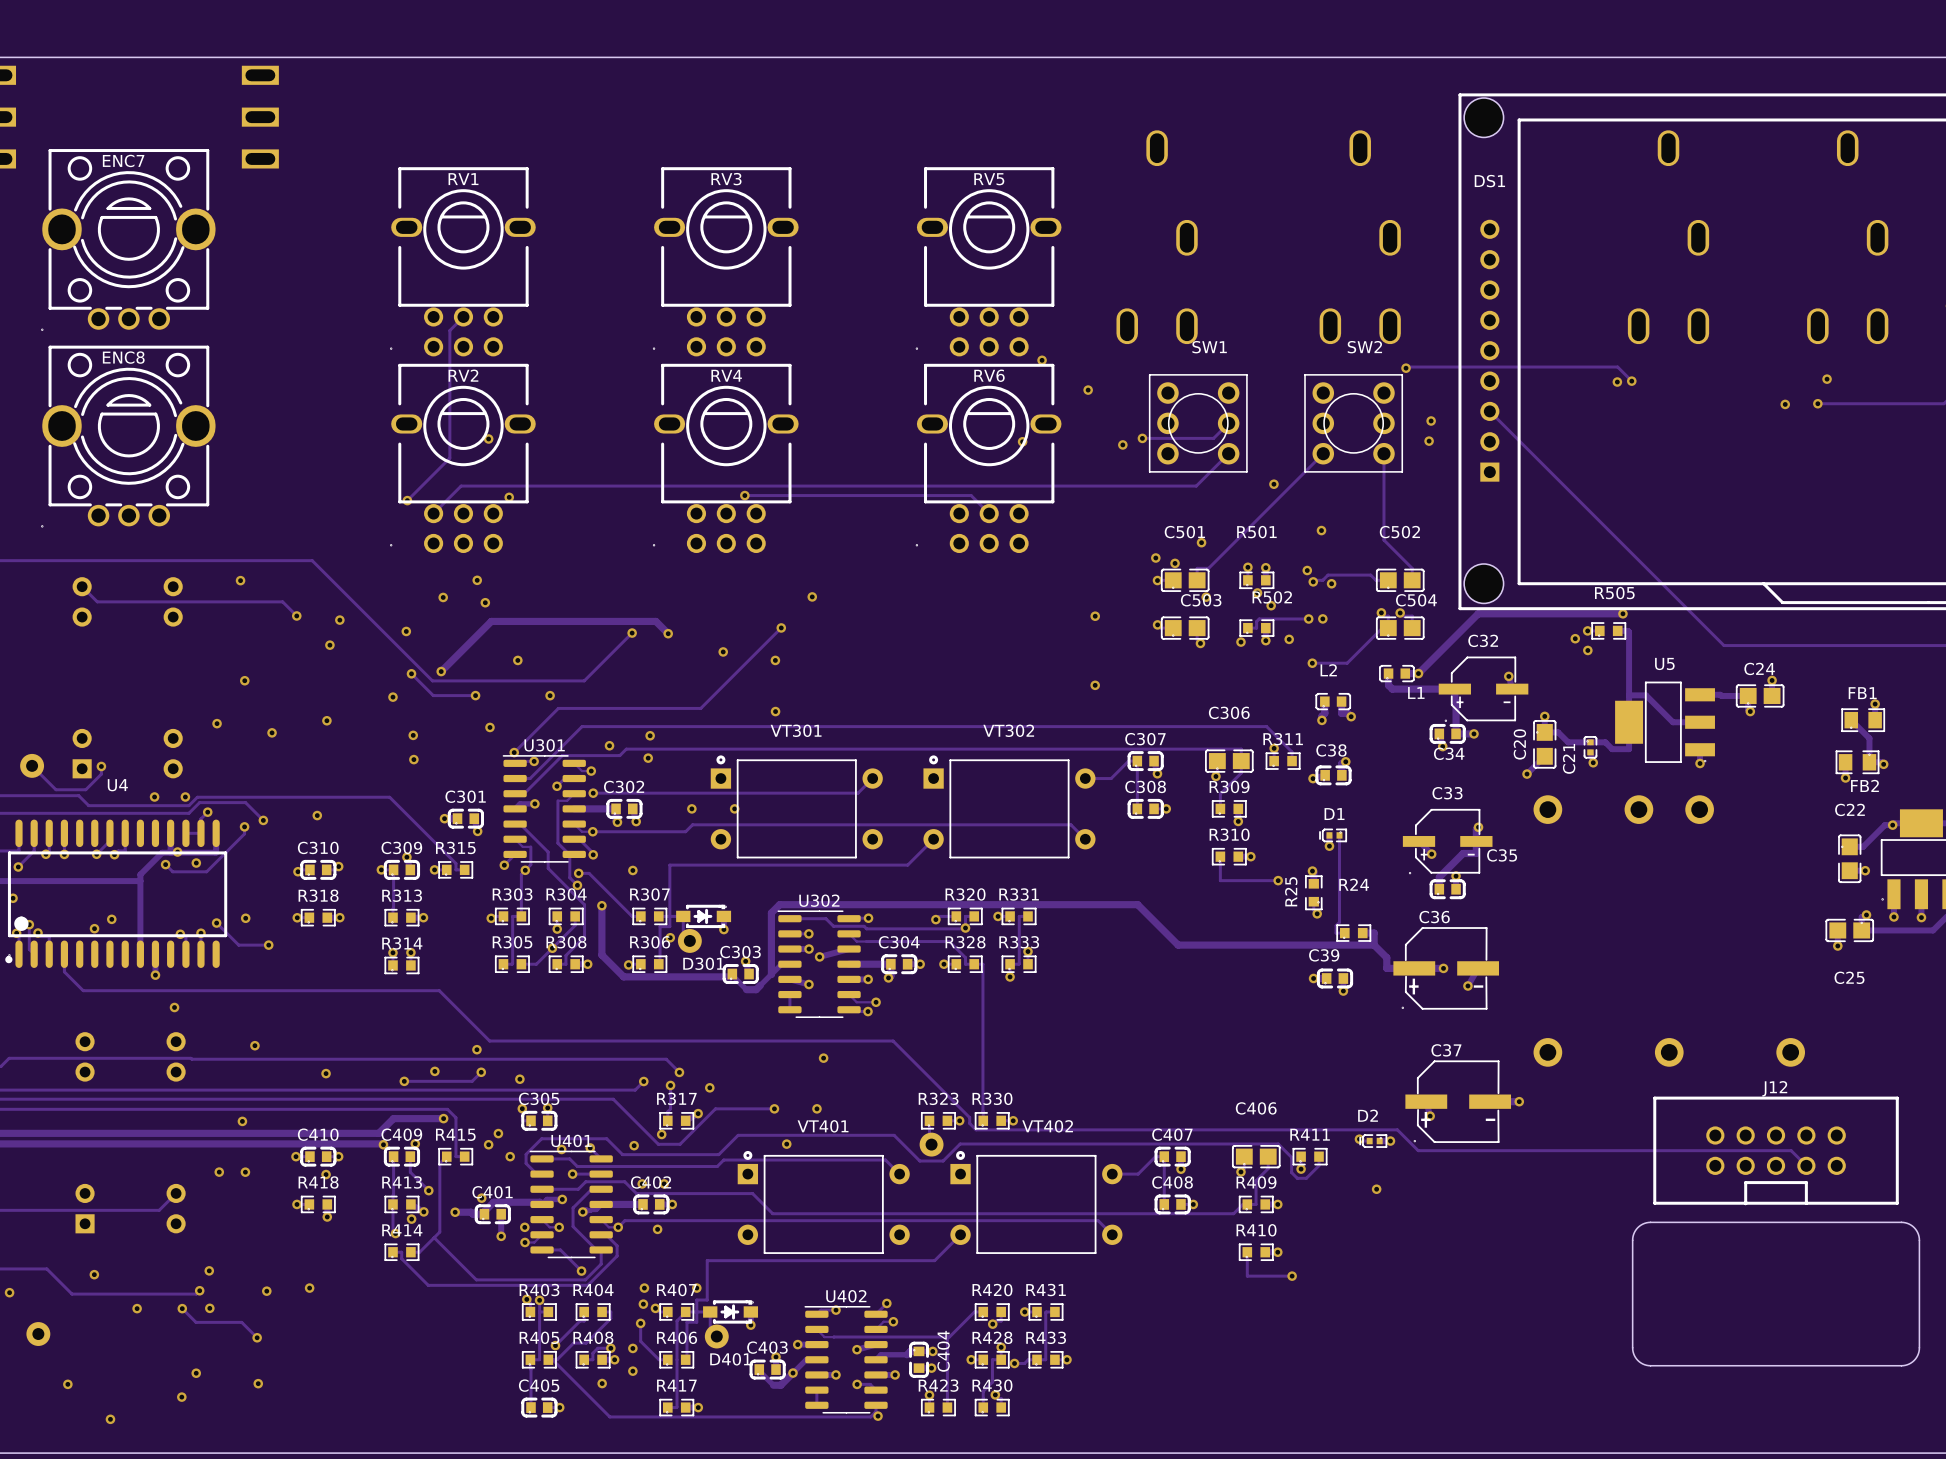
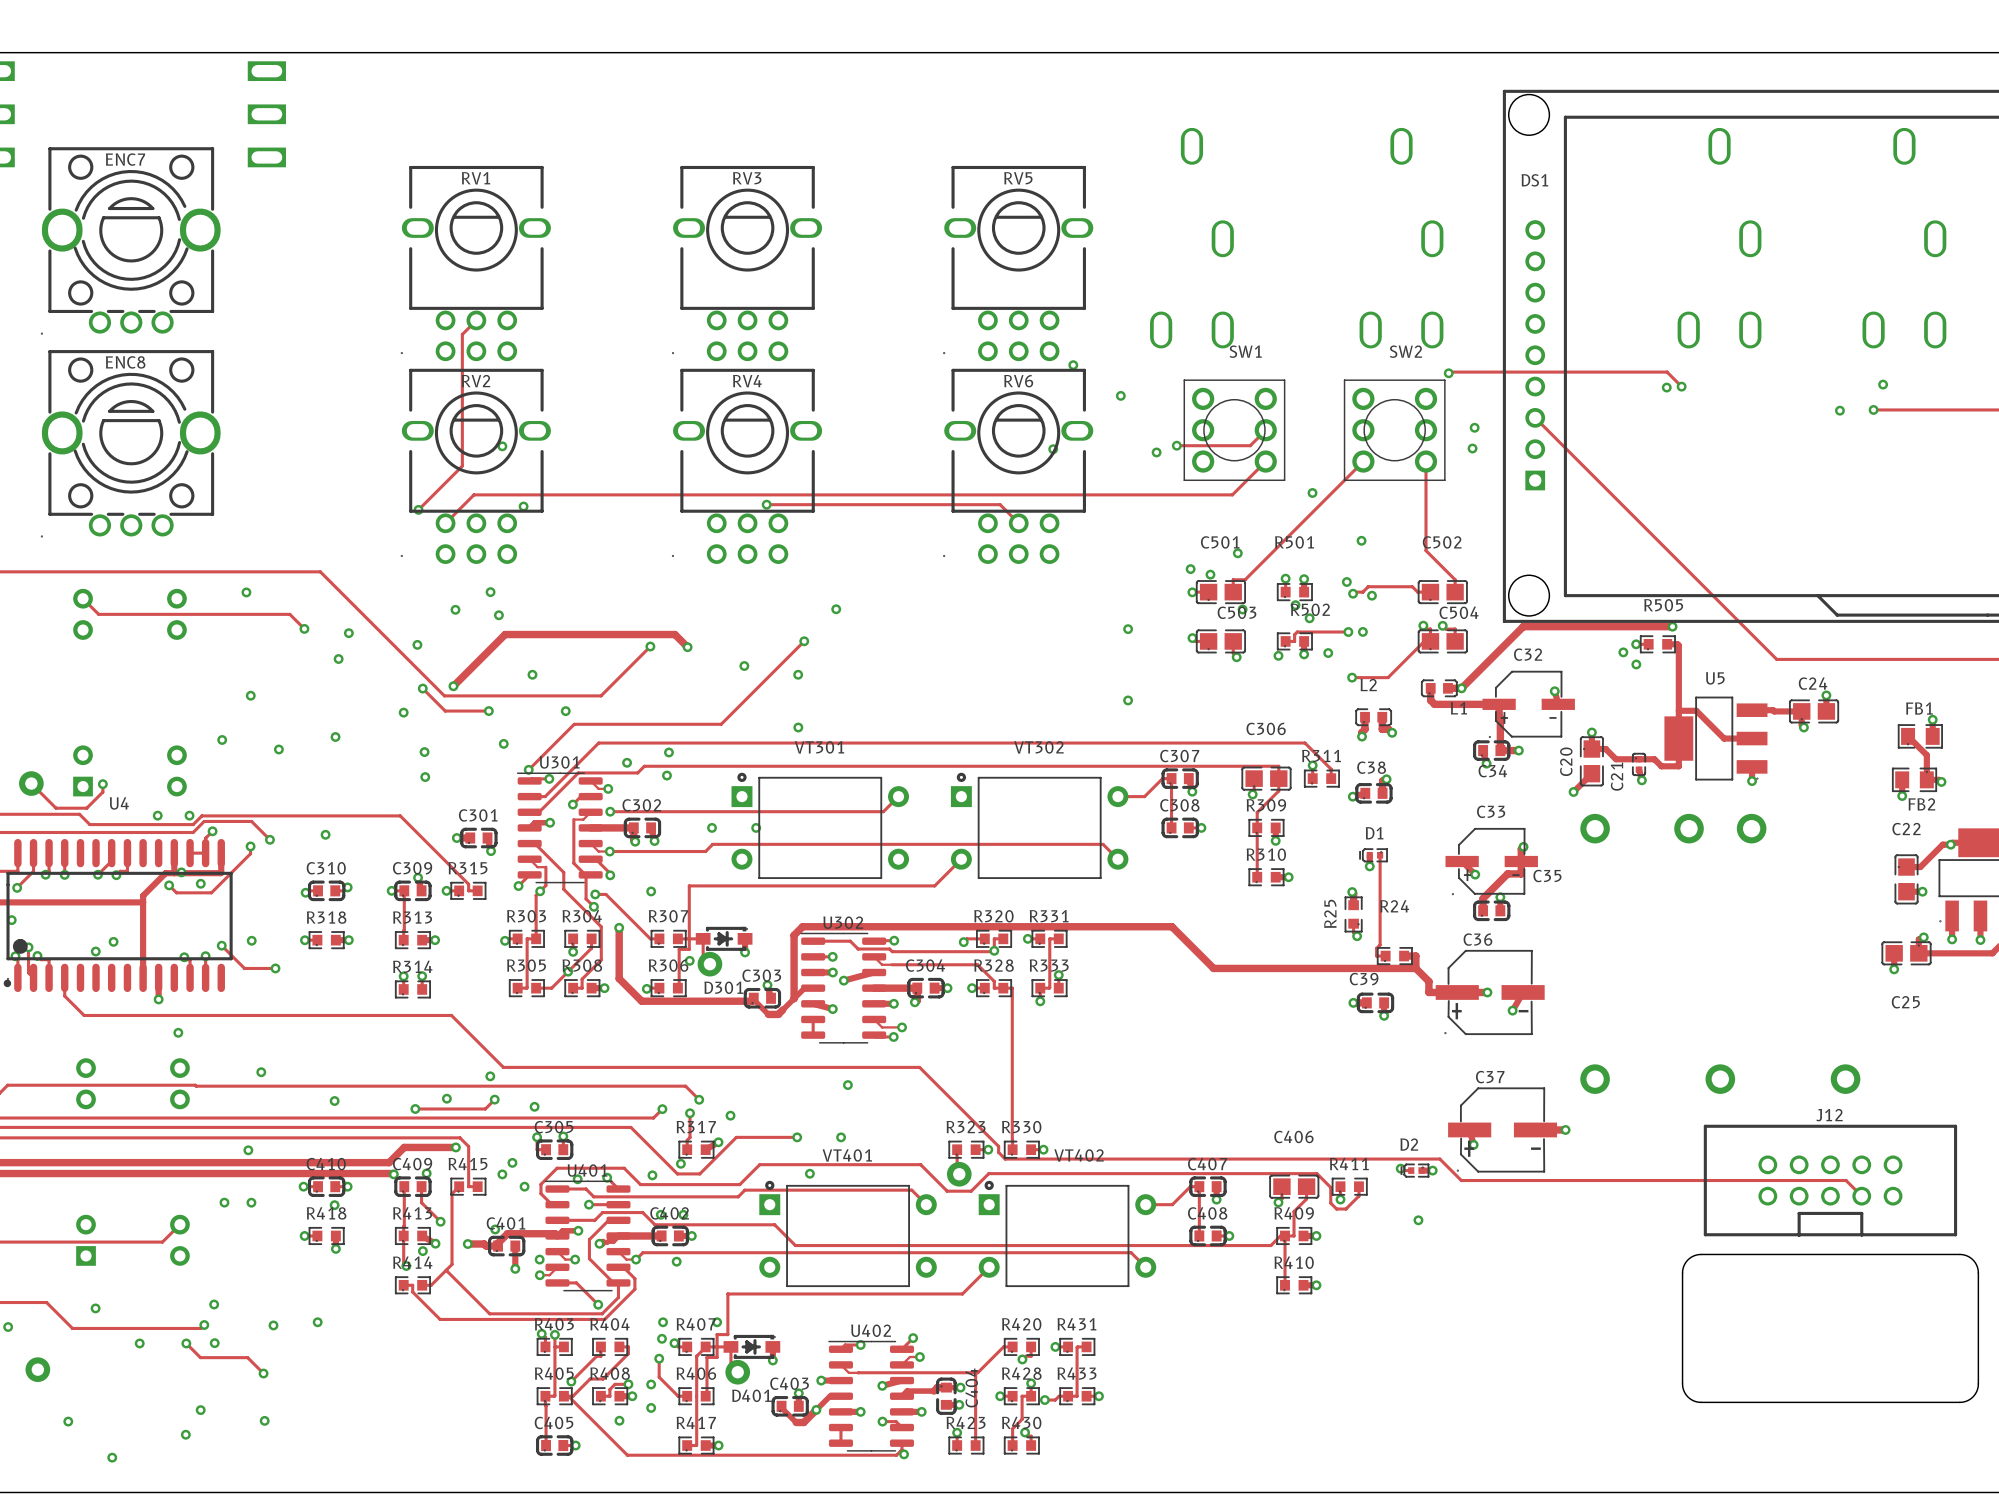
track: (1220, 856) (1220, 880) (1278, 880) -> (1257, 877) (1257, 827)
via: (1278, 880) -> none
track: (1247, 1252) (1247, 1276) (1292, 1276) -> (1285, 1285) (1285, 1235)
via: (1292, 1276) -> none

